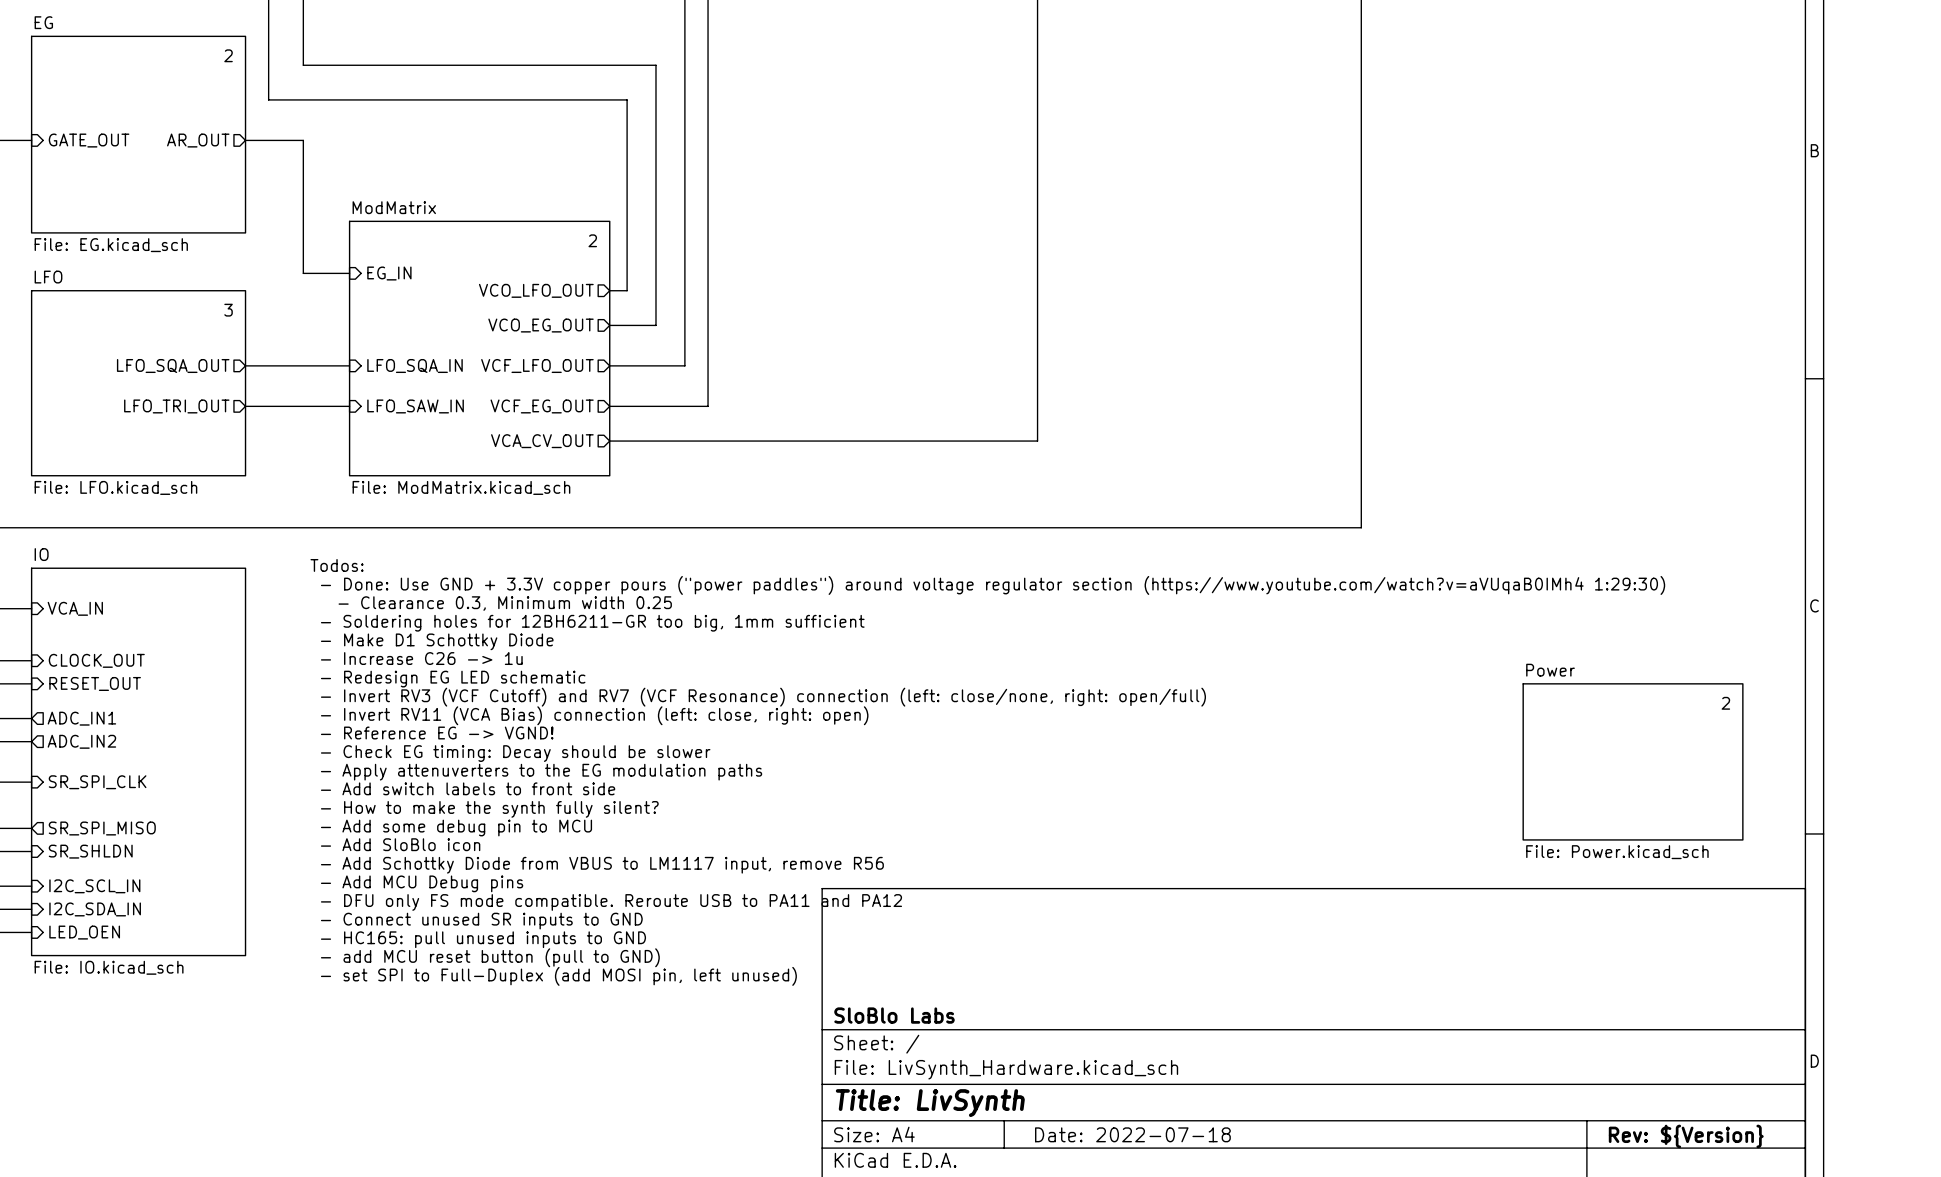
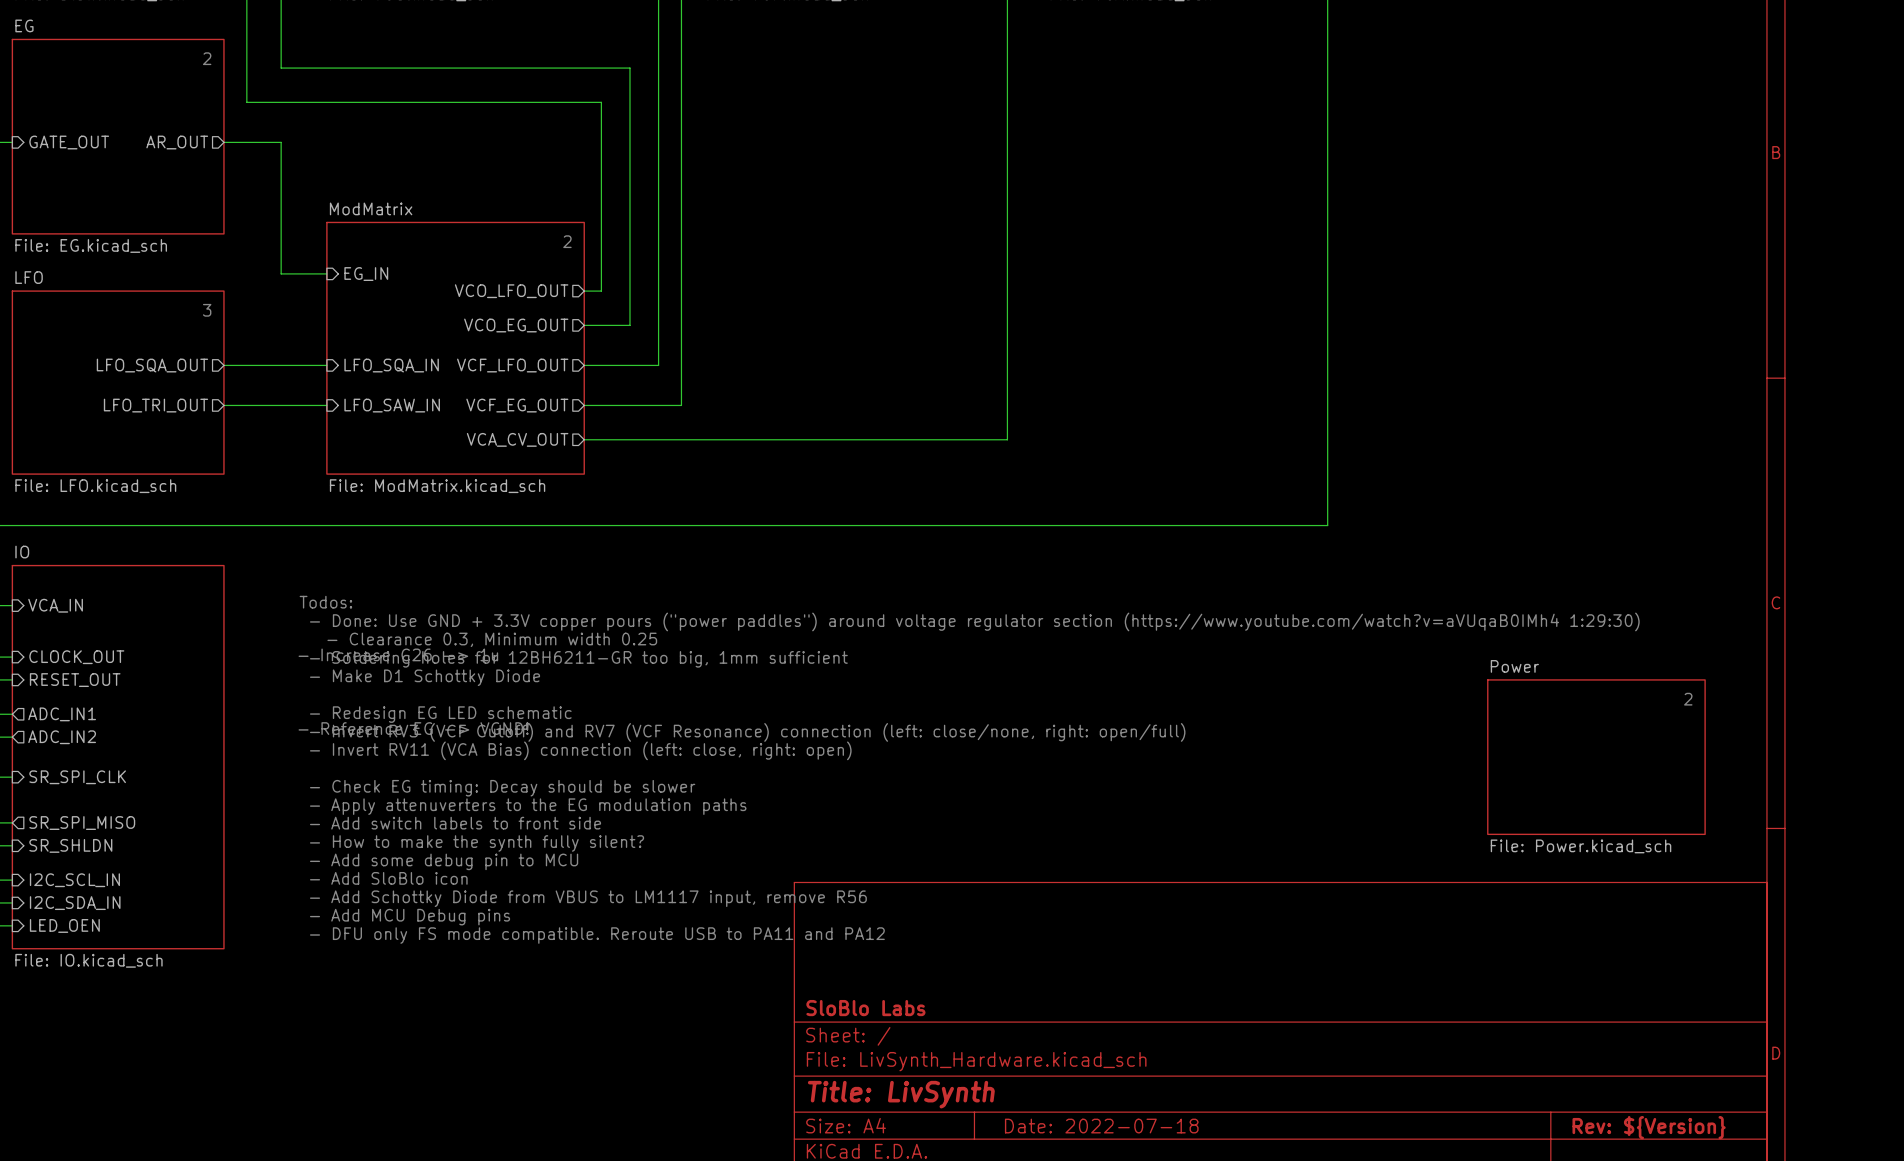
text position: Todos: (337, 565) -> Todos: (325, 602)
text position: - Done: Use GND + 3.3V copper pours ("power paddles") around voltage regulator section (https://www.youtube.com/watch?v=aVUqaB0IMh4 1:29:30) (993, 585) -> - Done: Use GND + 3.3V copper pours ("power paddles") around voltage regulator section (https://www.youtube.com/watch?v=aVUqaB0IMh4 1:29:30) (974, 621)
text position: - Clearance 0.3, Minimum width 0.25 (505, 603) -> - Clearance 0.3, Minimum width 0.25 (492, 639)
text position: - Soldering holes for 12BH6211-GR too big, 1mm sufficient (592, 623) -> - Soldering holes for 12BH6211-GR too big, 1mm sufficient (578, 659)
text position: - Make D1 Schottky Diode (437, 641) -> - Make D1 Schottky Diode (425, 677)
text position: - Redesign EG LED schematic (453, 679) -> - Redesign EG LED schematic (440, 714)
text position: - Invert RV3 (VCF Cutoff) and RV7 (VCF Resonance) connection (left: close/none, right: open/full) (763, 697) -> - Invert RV3 (VCF Cutoff) and RV7 (VCF Resonance) connection (left: close/none, right: open/full) (747, 732)
text position: - Invert RV11 (VCA Bias) connection (left: close, right: open) (594, 715) -> - Invert RV11 (VCA Bias) connection (left: close, right: open) (580, 750)
text position: - Check EG timing: Decay should be slower (515, 753) -> - Check EG timing: Decay should be slower (502, 788)
text position: - Apply attenuverters to the EG modulation paths (541, 772) -> - Apply attenuverters to the EG modulation paths (528, 806)
text position: - Add switch labels to front side (468, 788) -> - Add switch labels to front side (455, 823)
text position: - How to make the synth fully silent? (489, 809) -> - How to make the synth fully silent? (477, 843)
text position: - Add some debug pin to MCU (456, 828) -> - Add some debug pin to MCU (444, 861)
text position: - Add SloBlo icon (400, 844) -> - Add SloBlo icon (388, 878)
text position: - Add Schottky Diode from VBUS to LM1117 input, remove R56 (602, 865) -> - Add Schottky Diode from VBUS to LM1117 input, remove R56 (588, 898)
text position: - Add MCU Debug pins (422, 883) -> - Add MCU Debug pins (410, 917)
text position: - DFU only FS mode compatible. Reroute USB to PA11 and PA12 (611, 902) -> - DFU only FS mode compatible. Reroute USB to PA11 and PA12 (597, 935)
text: - Connect unused SR inputs to GND (481, 921) -> none
text: - HC165: pull unused inputs to GND (483, 939) -> none
text: - add MCU reset button (pull to GND) (490, 957) -> none
text: - set SPI to Full-Duplex (add MOSI pin, left unused) (558, 976) -> none

